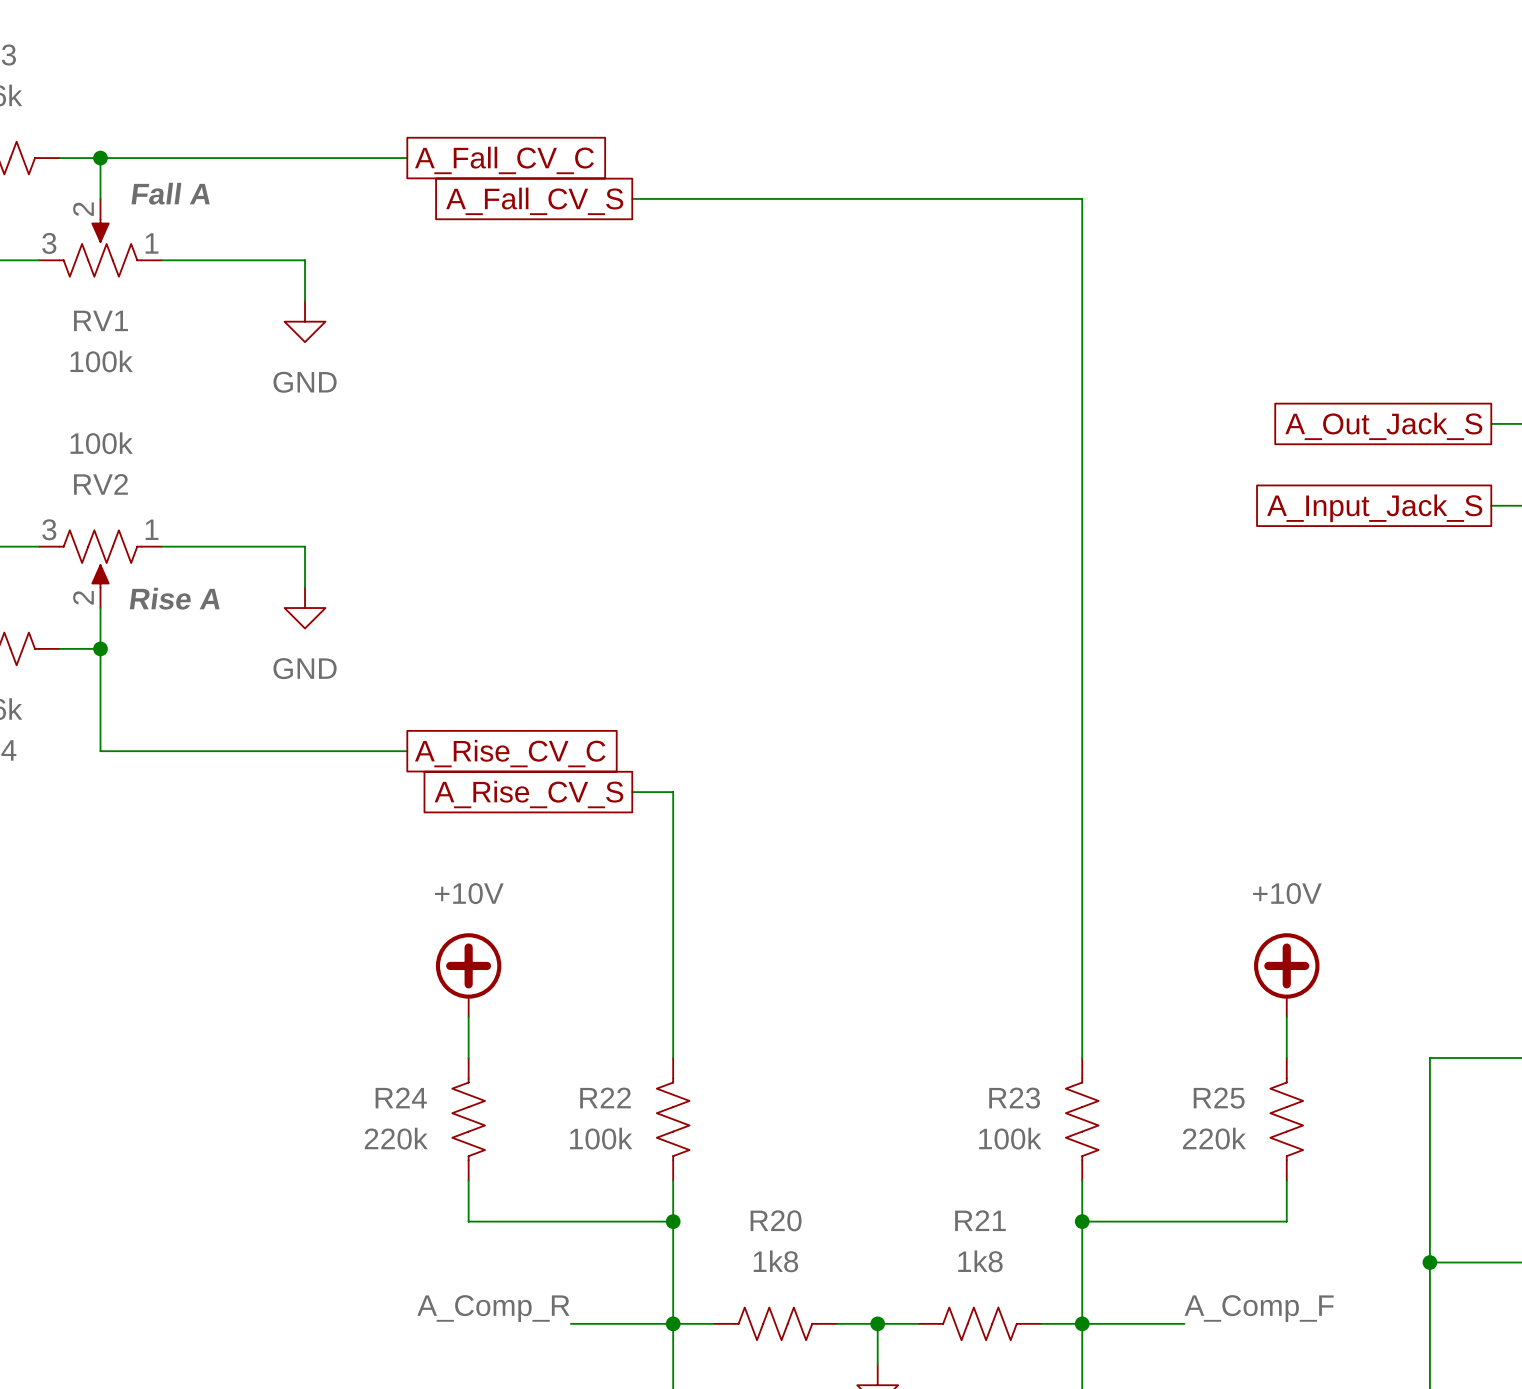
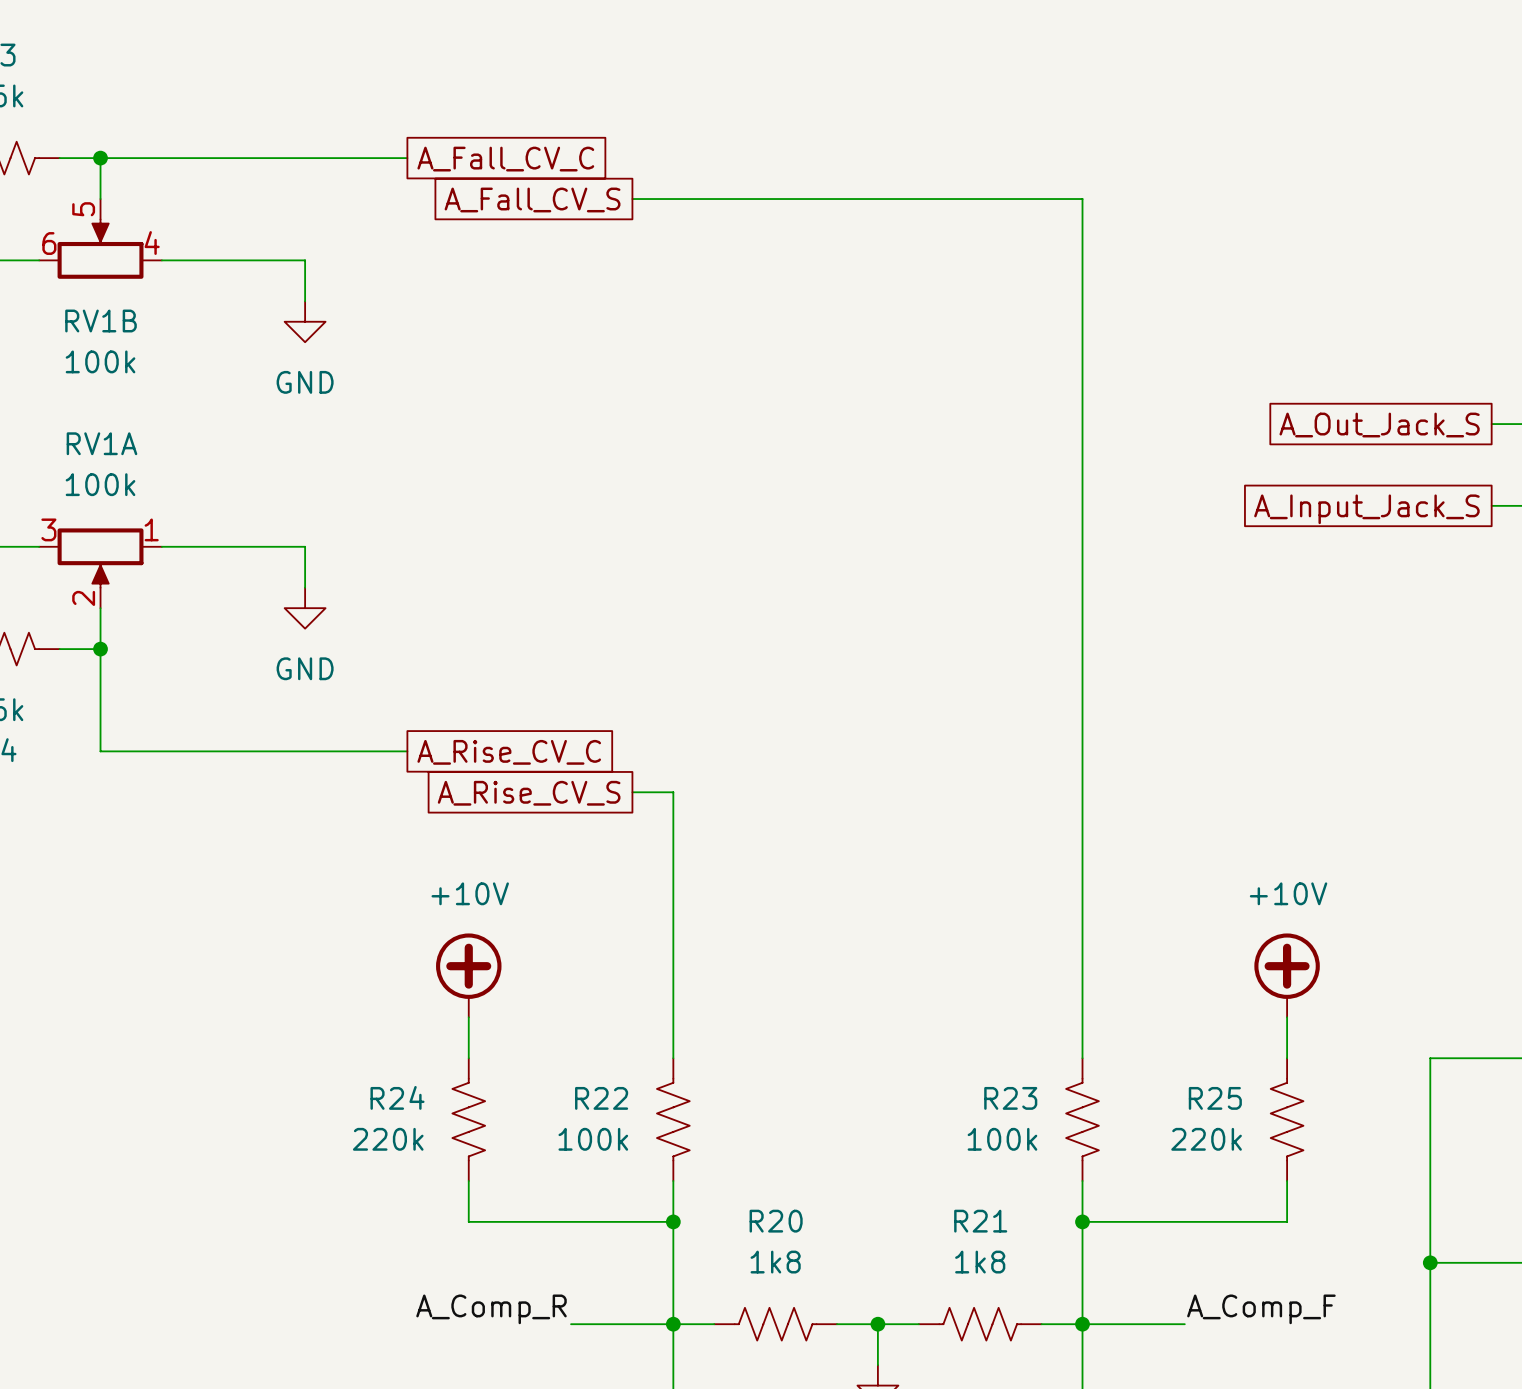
RV1: 100k (100, 237) -> none
RV1B: none -> 100k (100, 238)
RV1A: none -> 100k (100, 568)
RV2: 100k (100, 569) -> none

